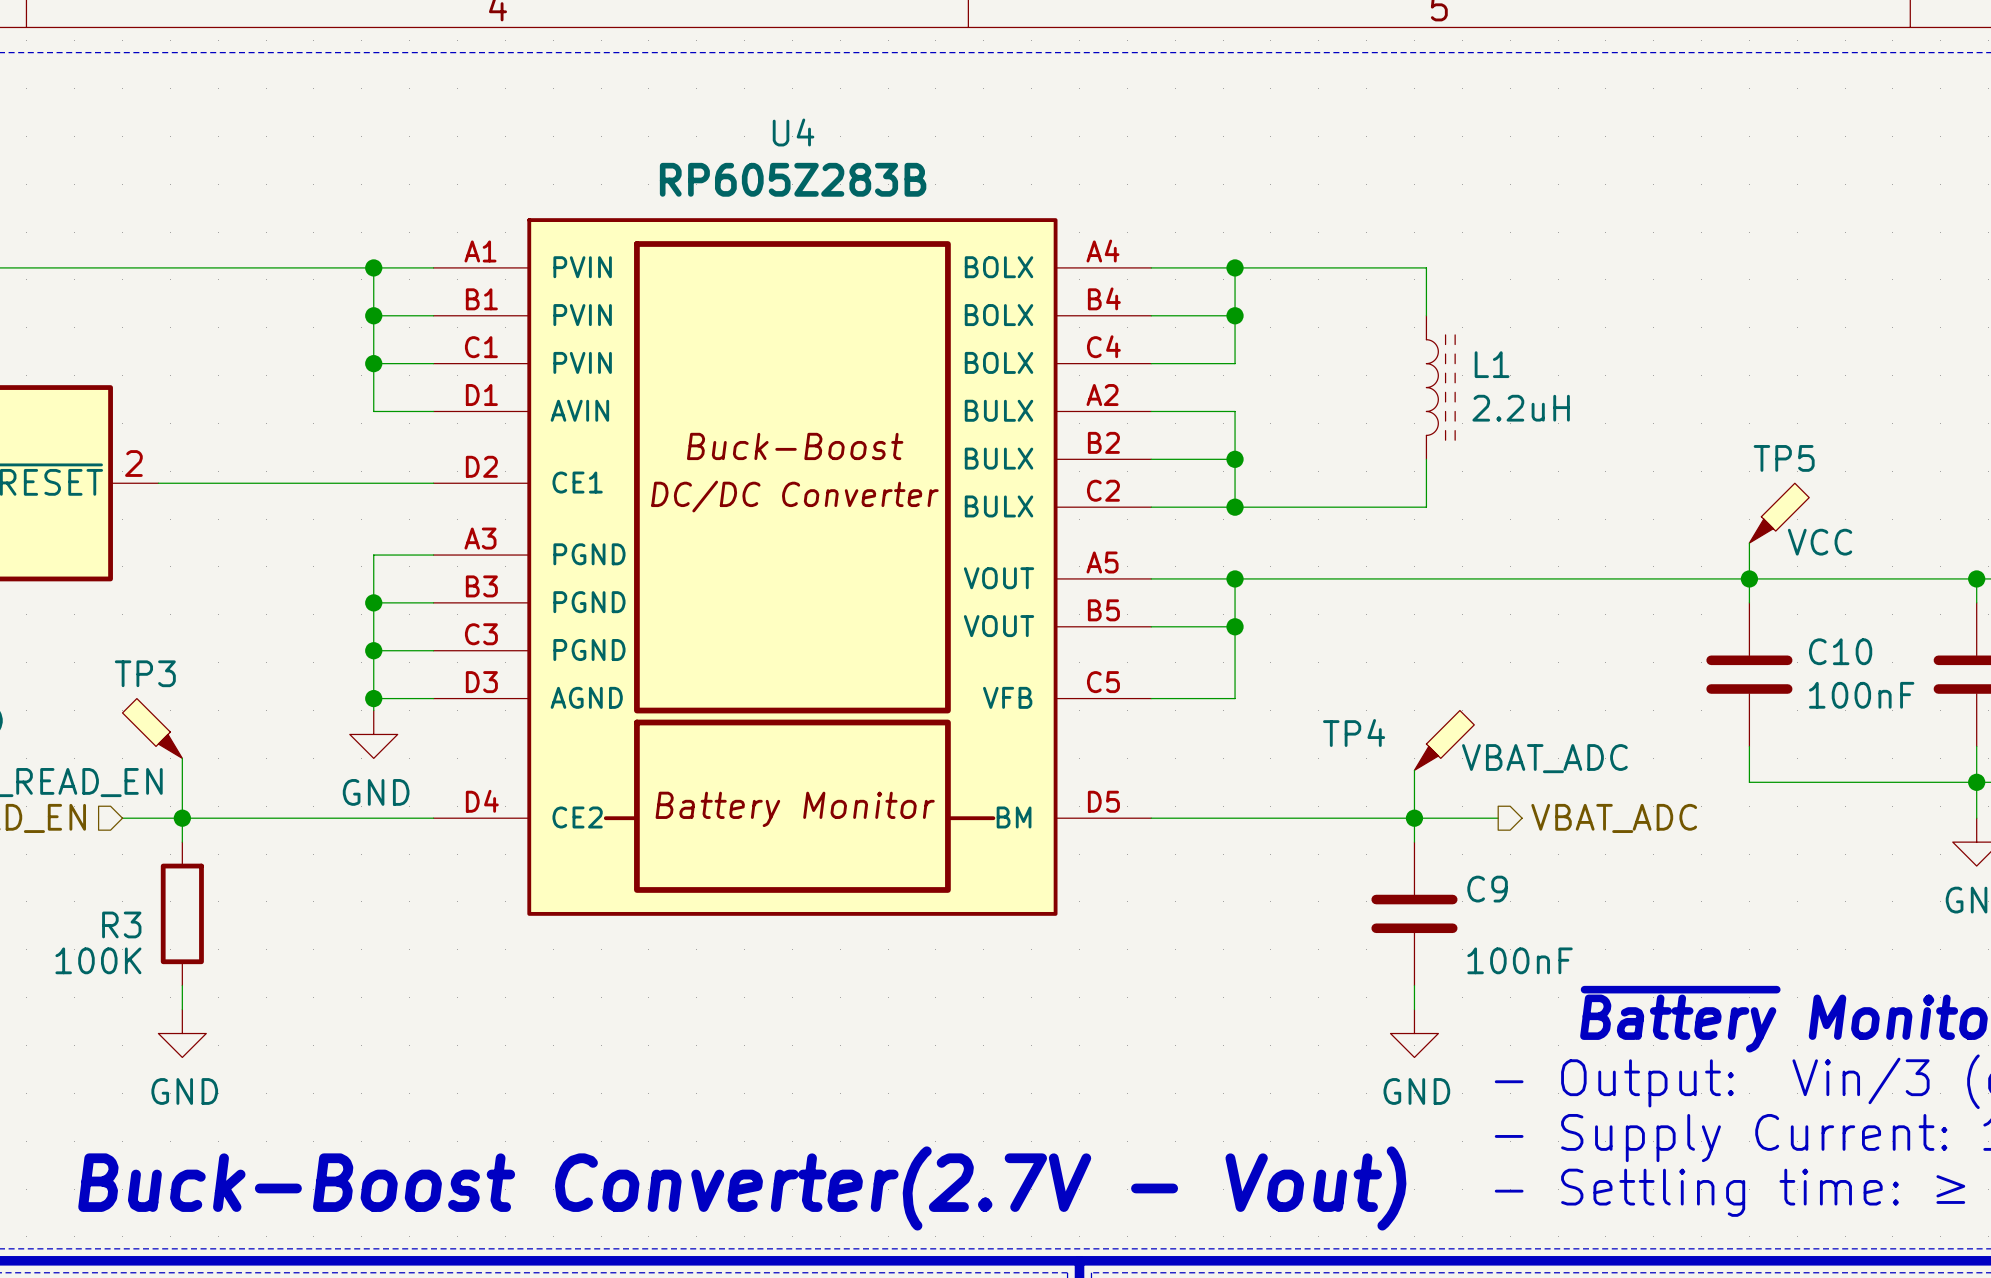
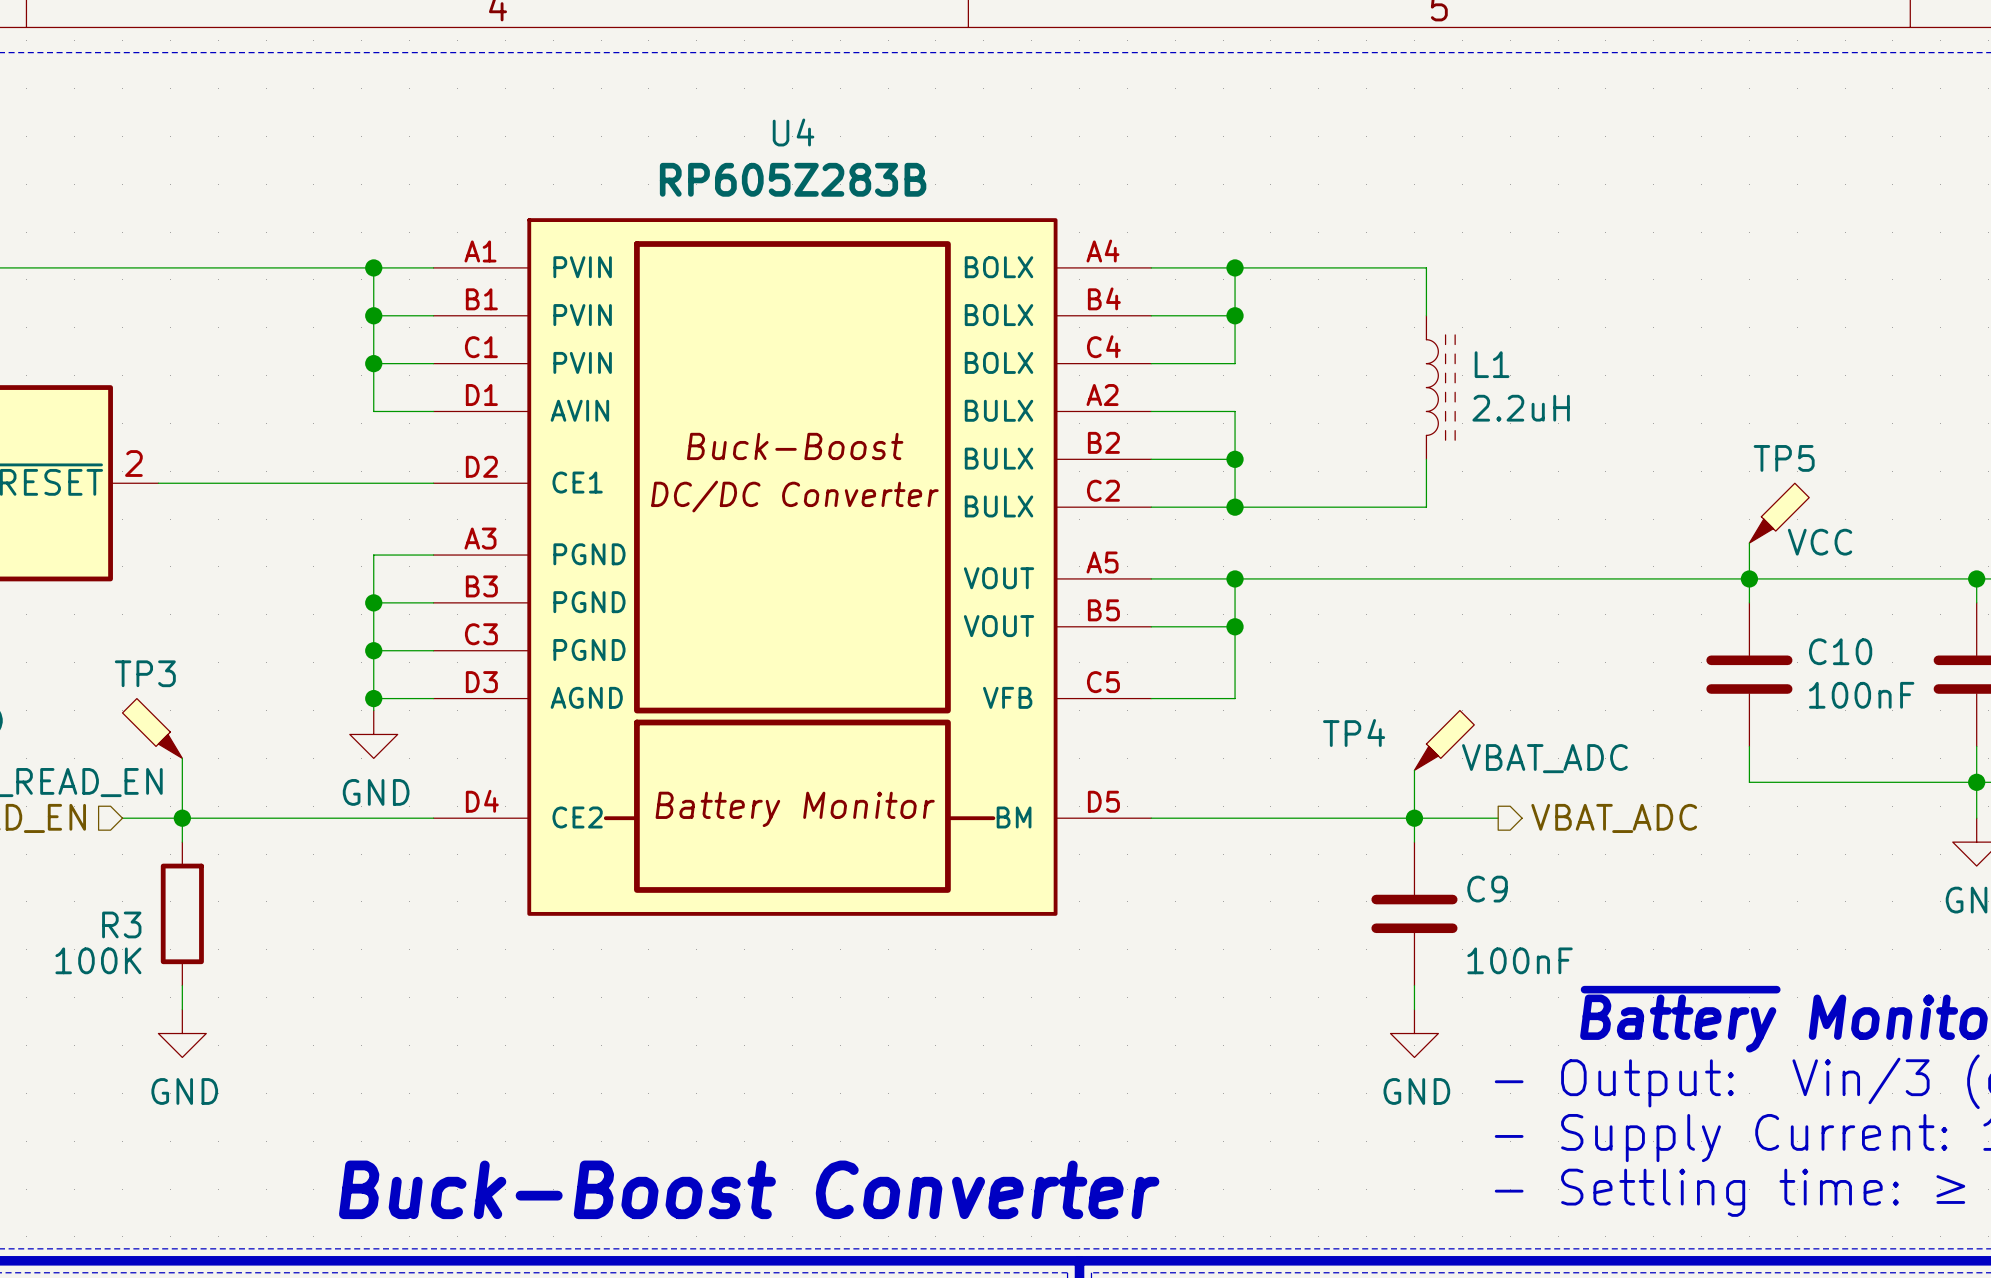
text: Buck-Boost Converter(2.7V - Vout) (742, 1188) -> Buck-Boost Converter (749, 1189)

